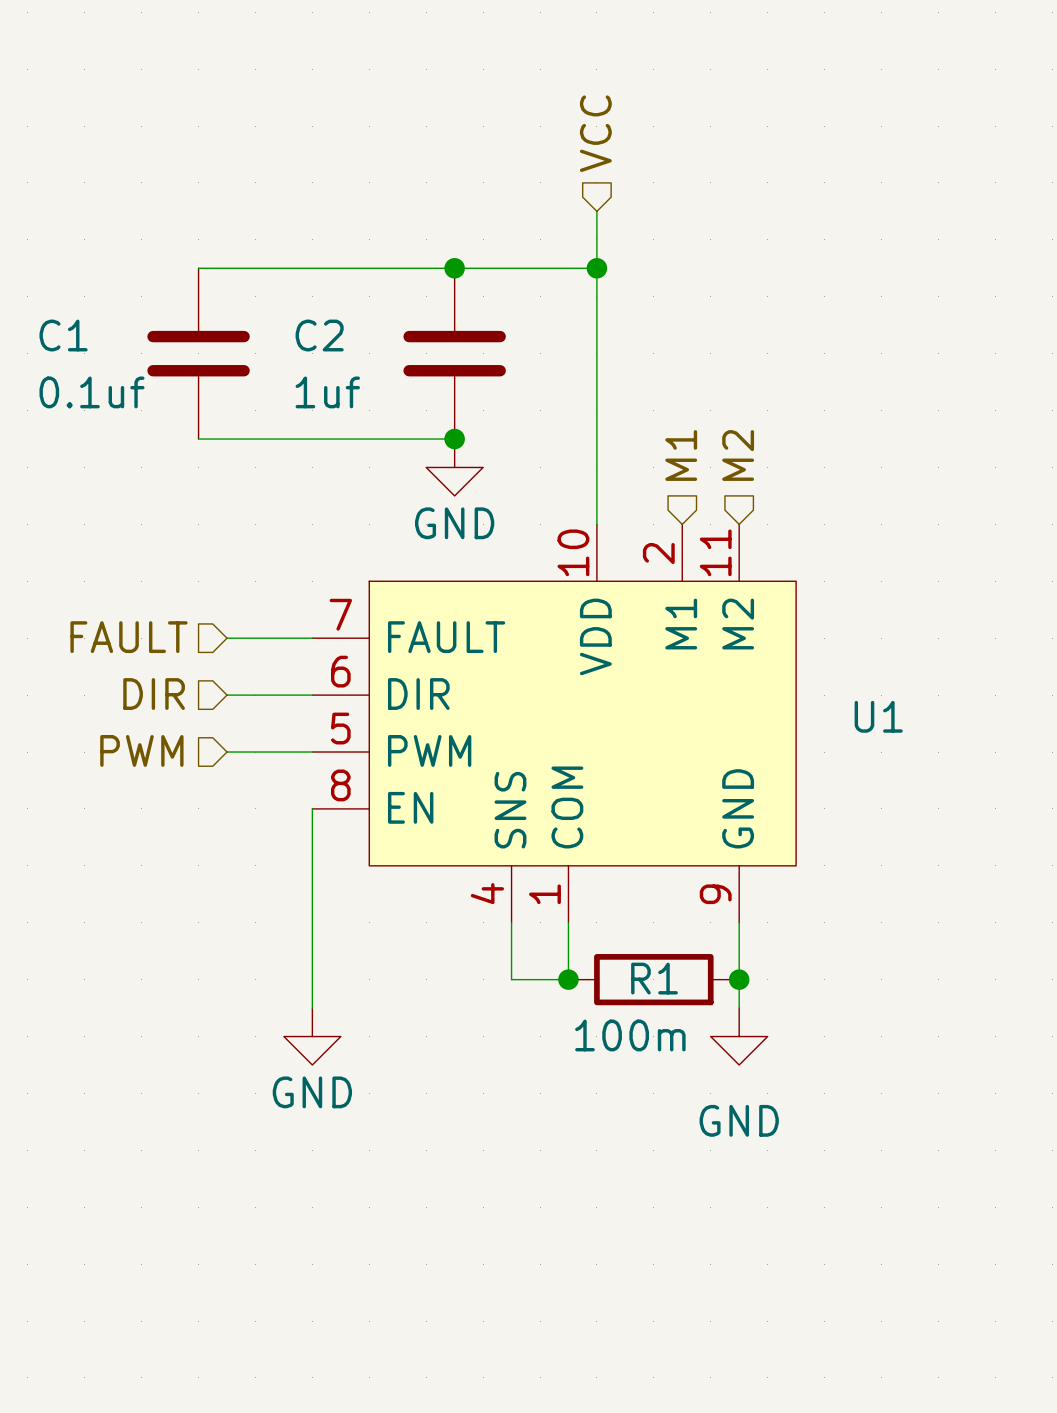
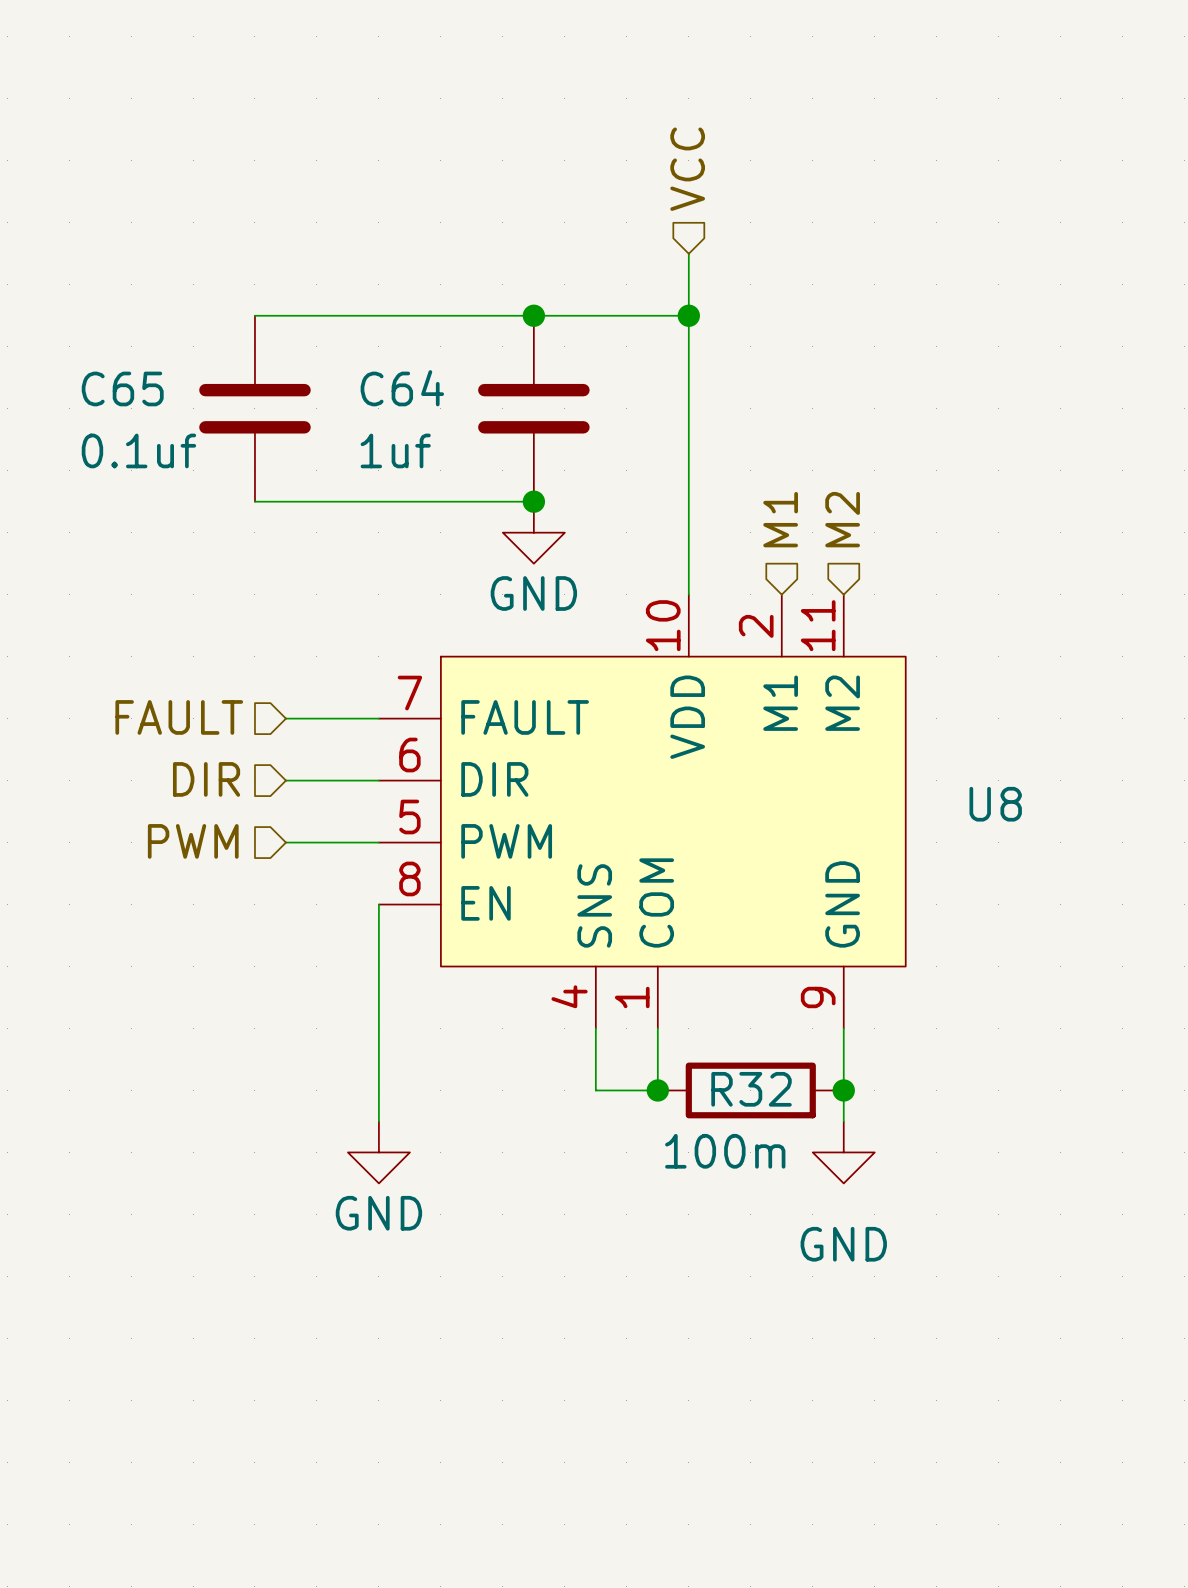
C1 name: C1 (63, 335) -> C65 (122, 388)
C2 name: C2 (319, 335) -> C64 (402, 388)
U1 name: U1 (878, 716) -> U8 (995, 804)
R1 name: R1 (654, 978) -> R32 (751, 1089)

